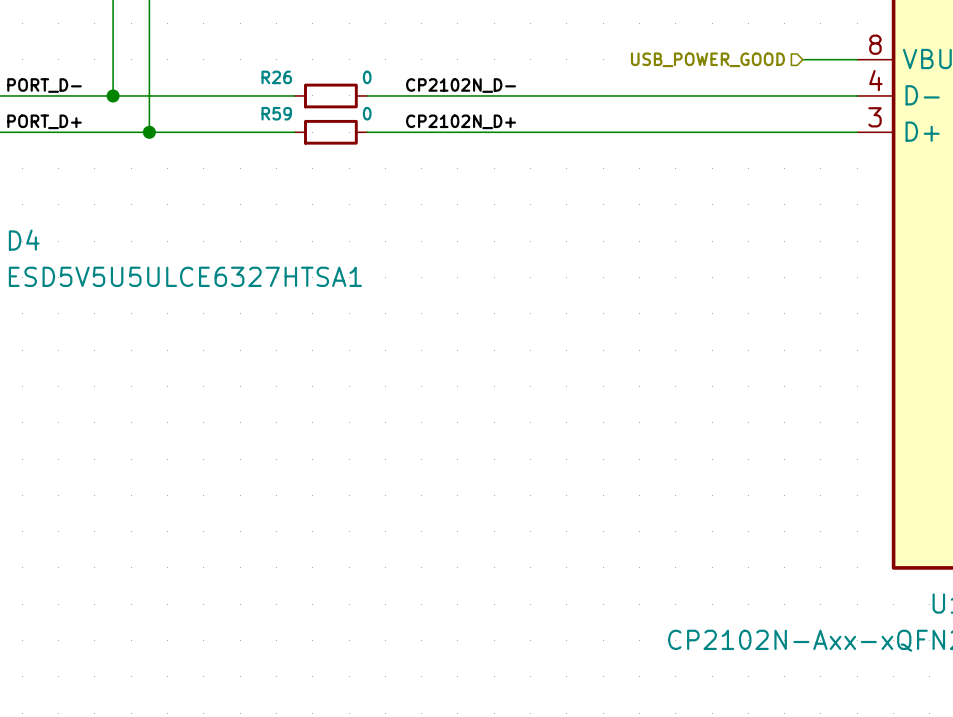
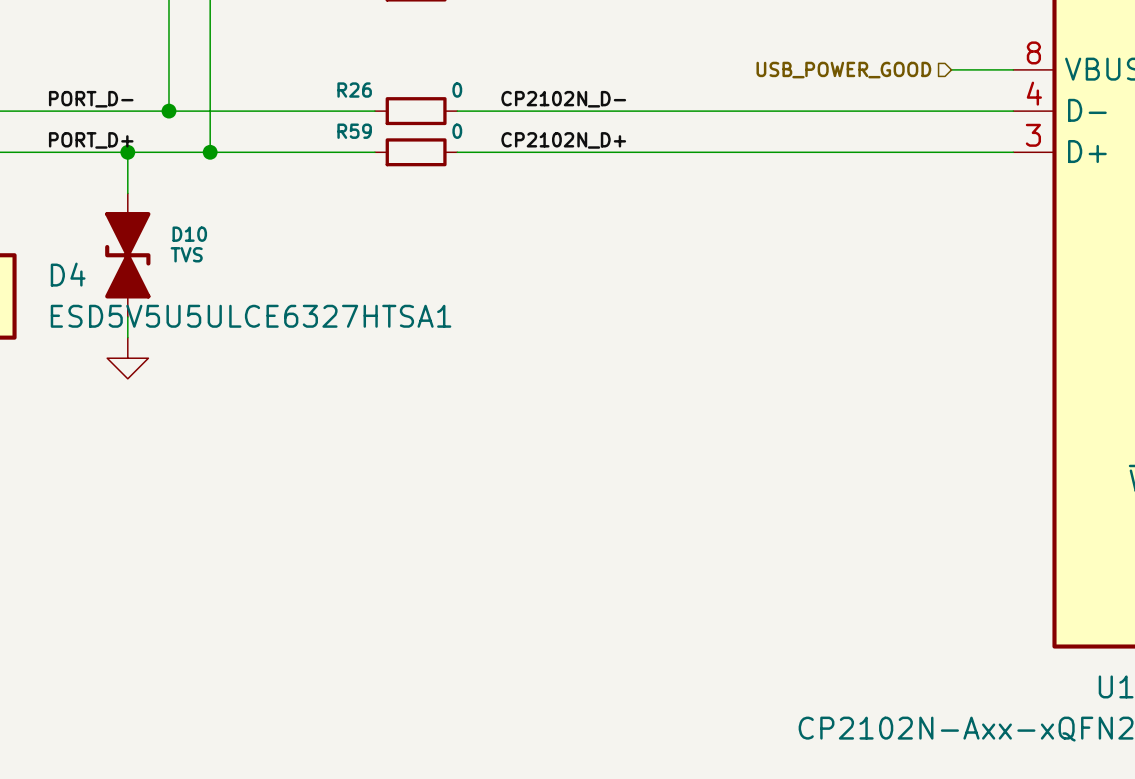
wire: none -> (127, 152) (127, 193)
junction: none -> (127, 152)
D10: none -> TVS (127, 255)
wire: none -> (127, 317) (127, 337)
power symbol: none -> (127, 358)

